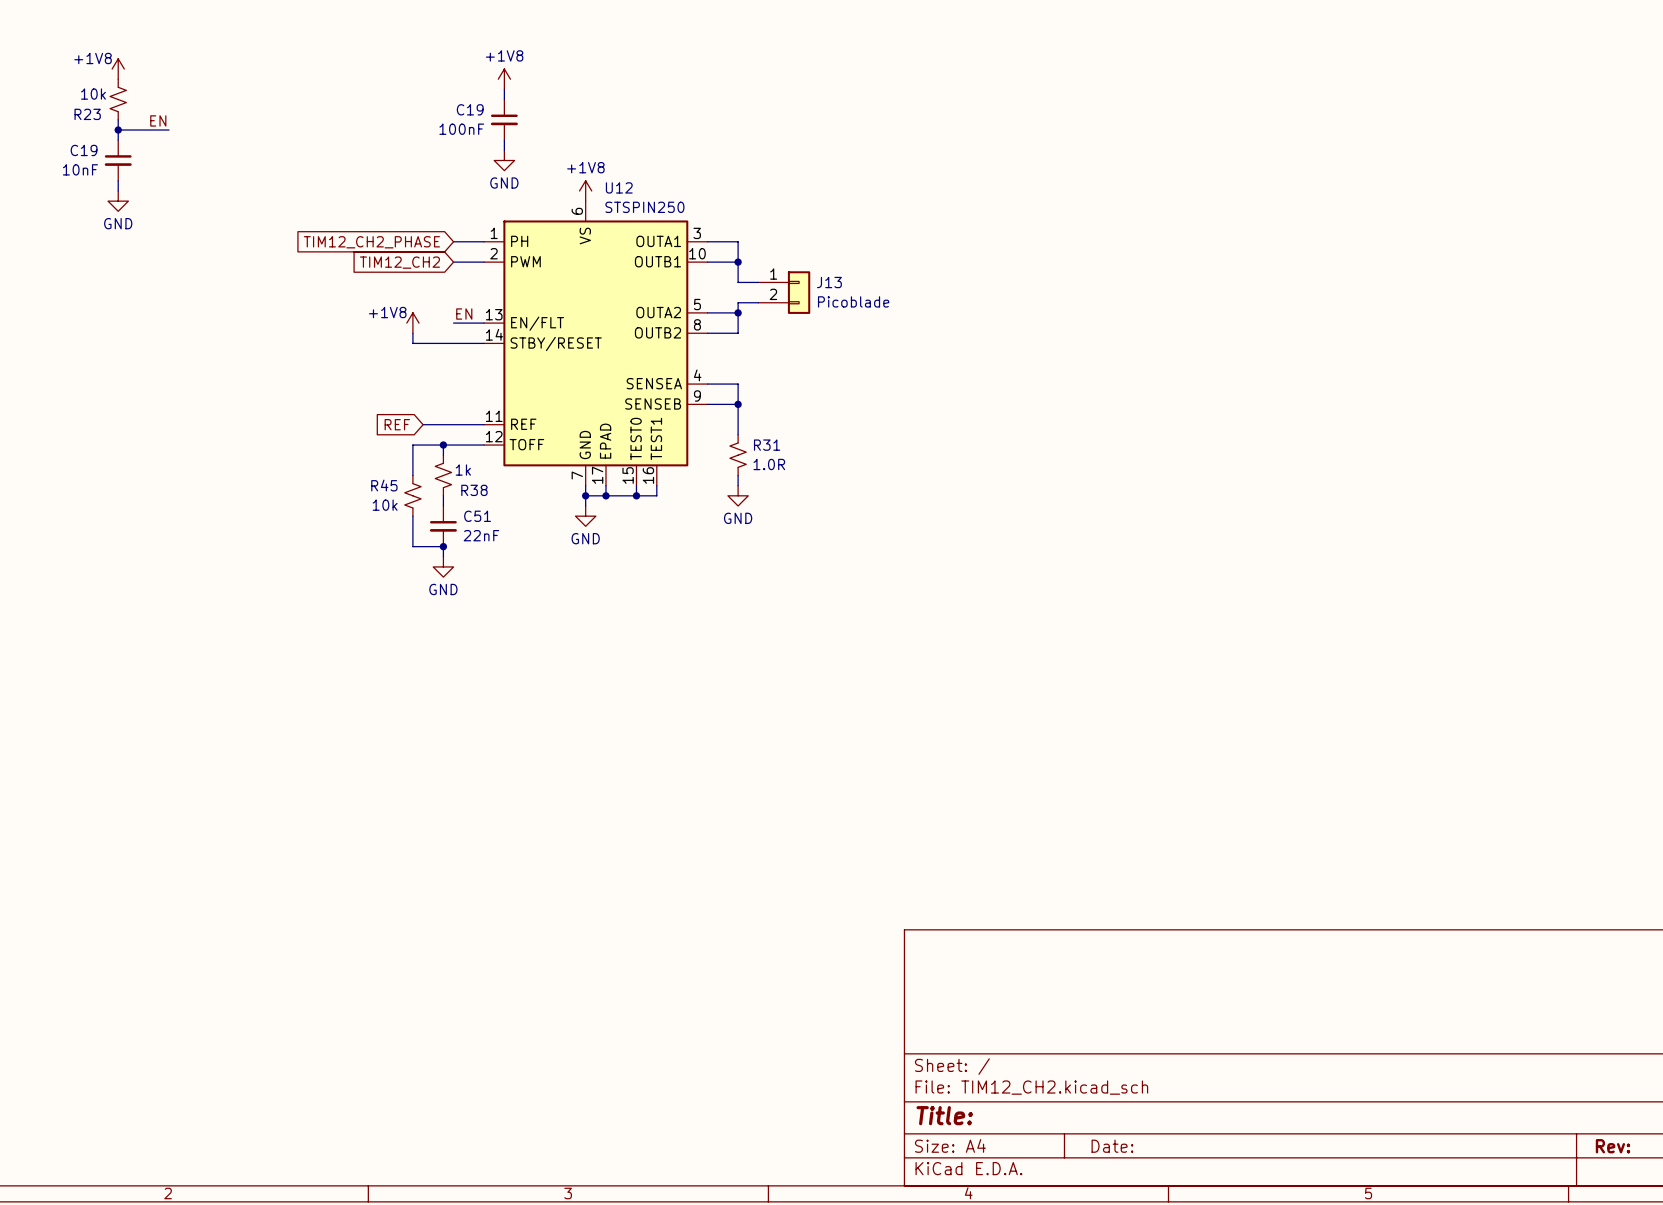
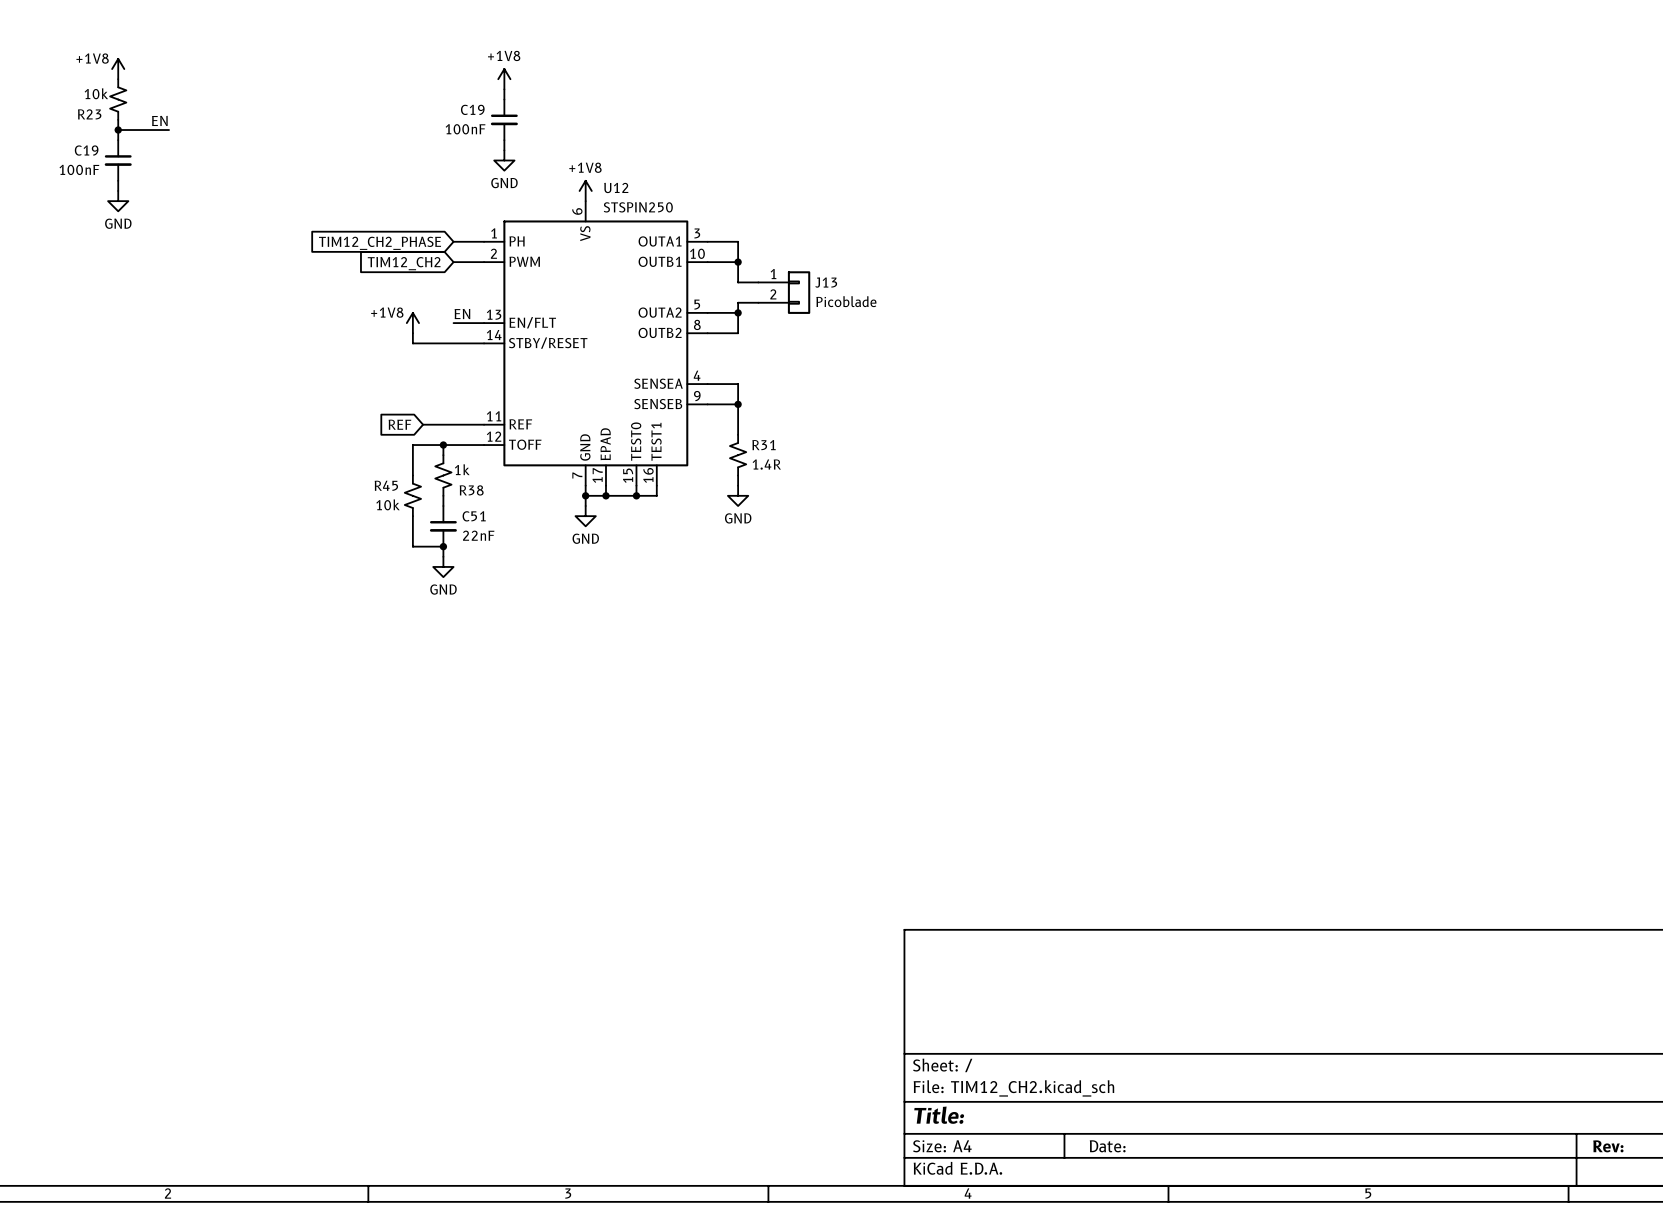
C19 value: 10nF (80, 169) -> 100nF (79, 169)
R31 value: 1.0R (769, 464) -> 1.4R (766, 464)

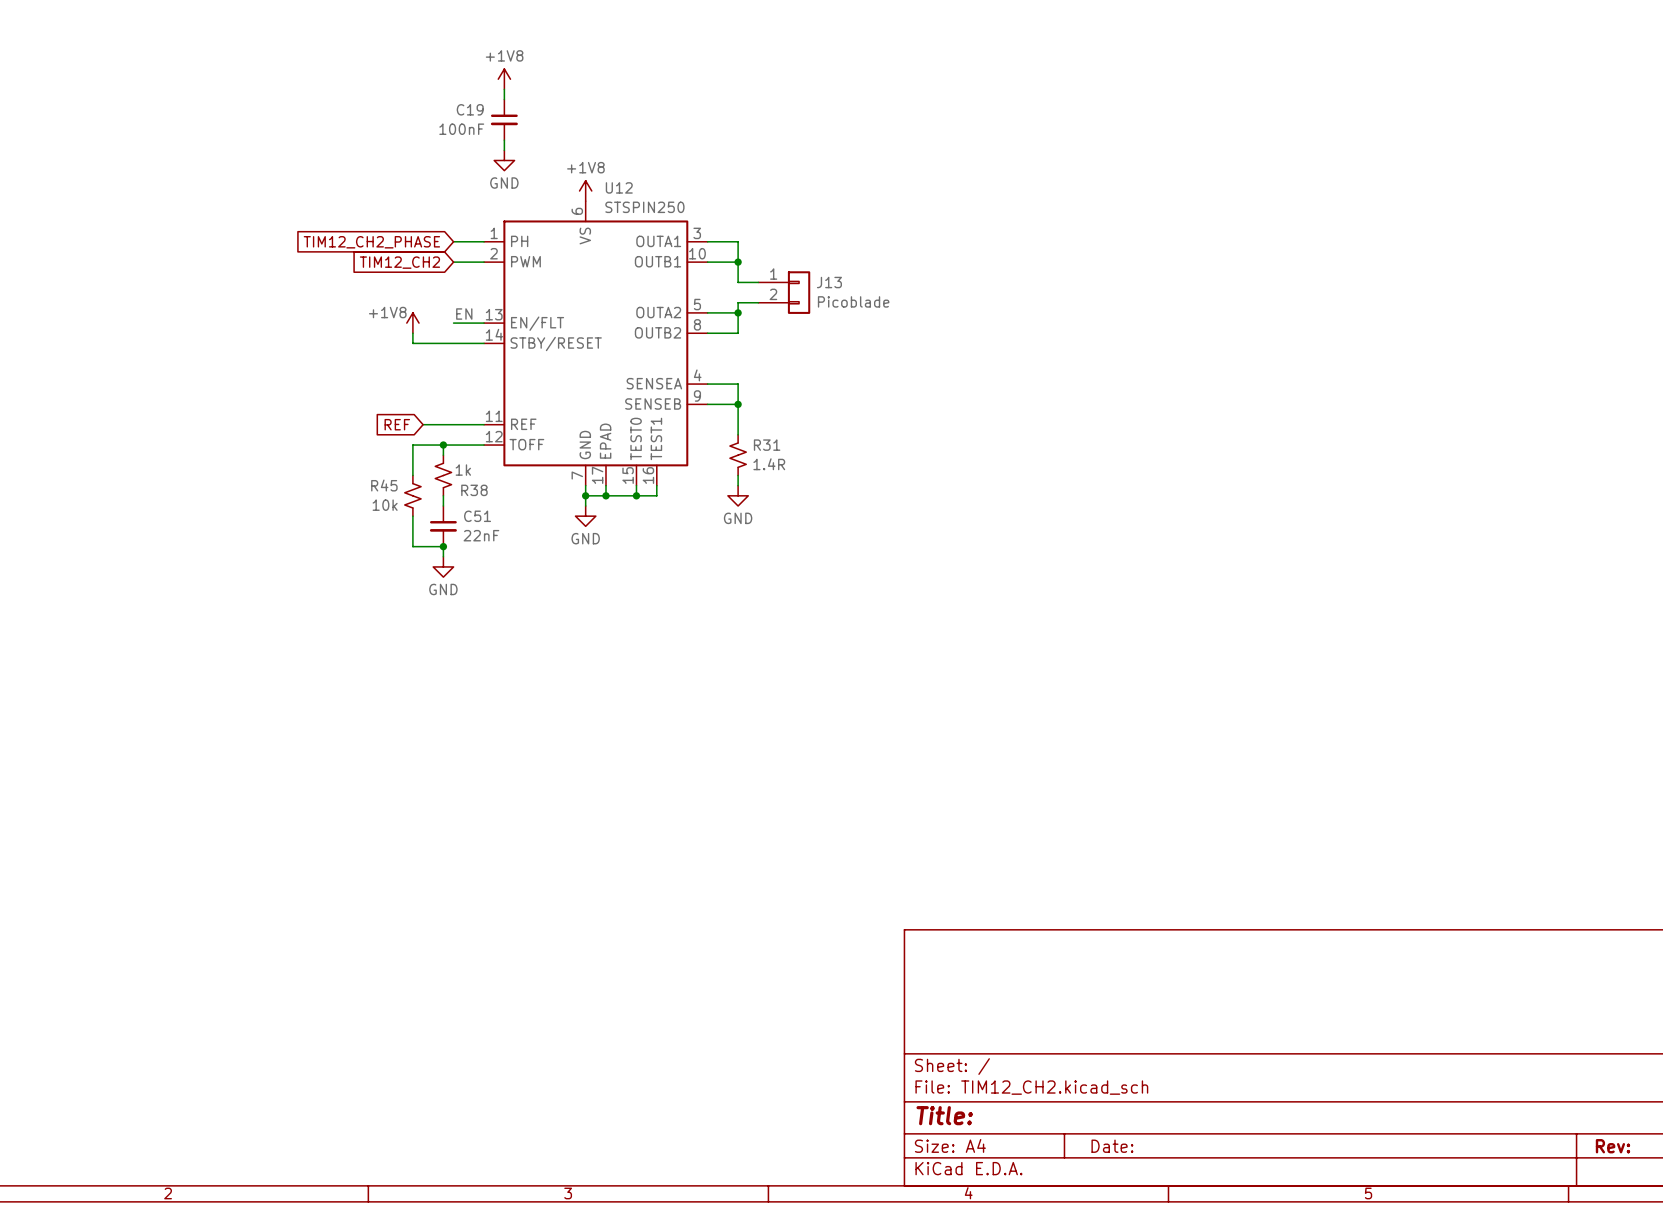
power symbol: +1V8 (118, 69) -> none
R23: 10k (118, 99) -> none
wire: (118, 119) (118, 140) -> none
label: EN (159, 120) -> none
wire: (118, 130) (169, 130) -> none
junction: (118, 130) -> none
C19: 100nF (118, 160) -> none
wire: (118, 180) (118, 190) -> none
power symbol: GND (118, 201) -> none

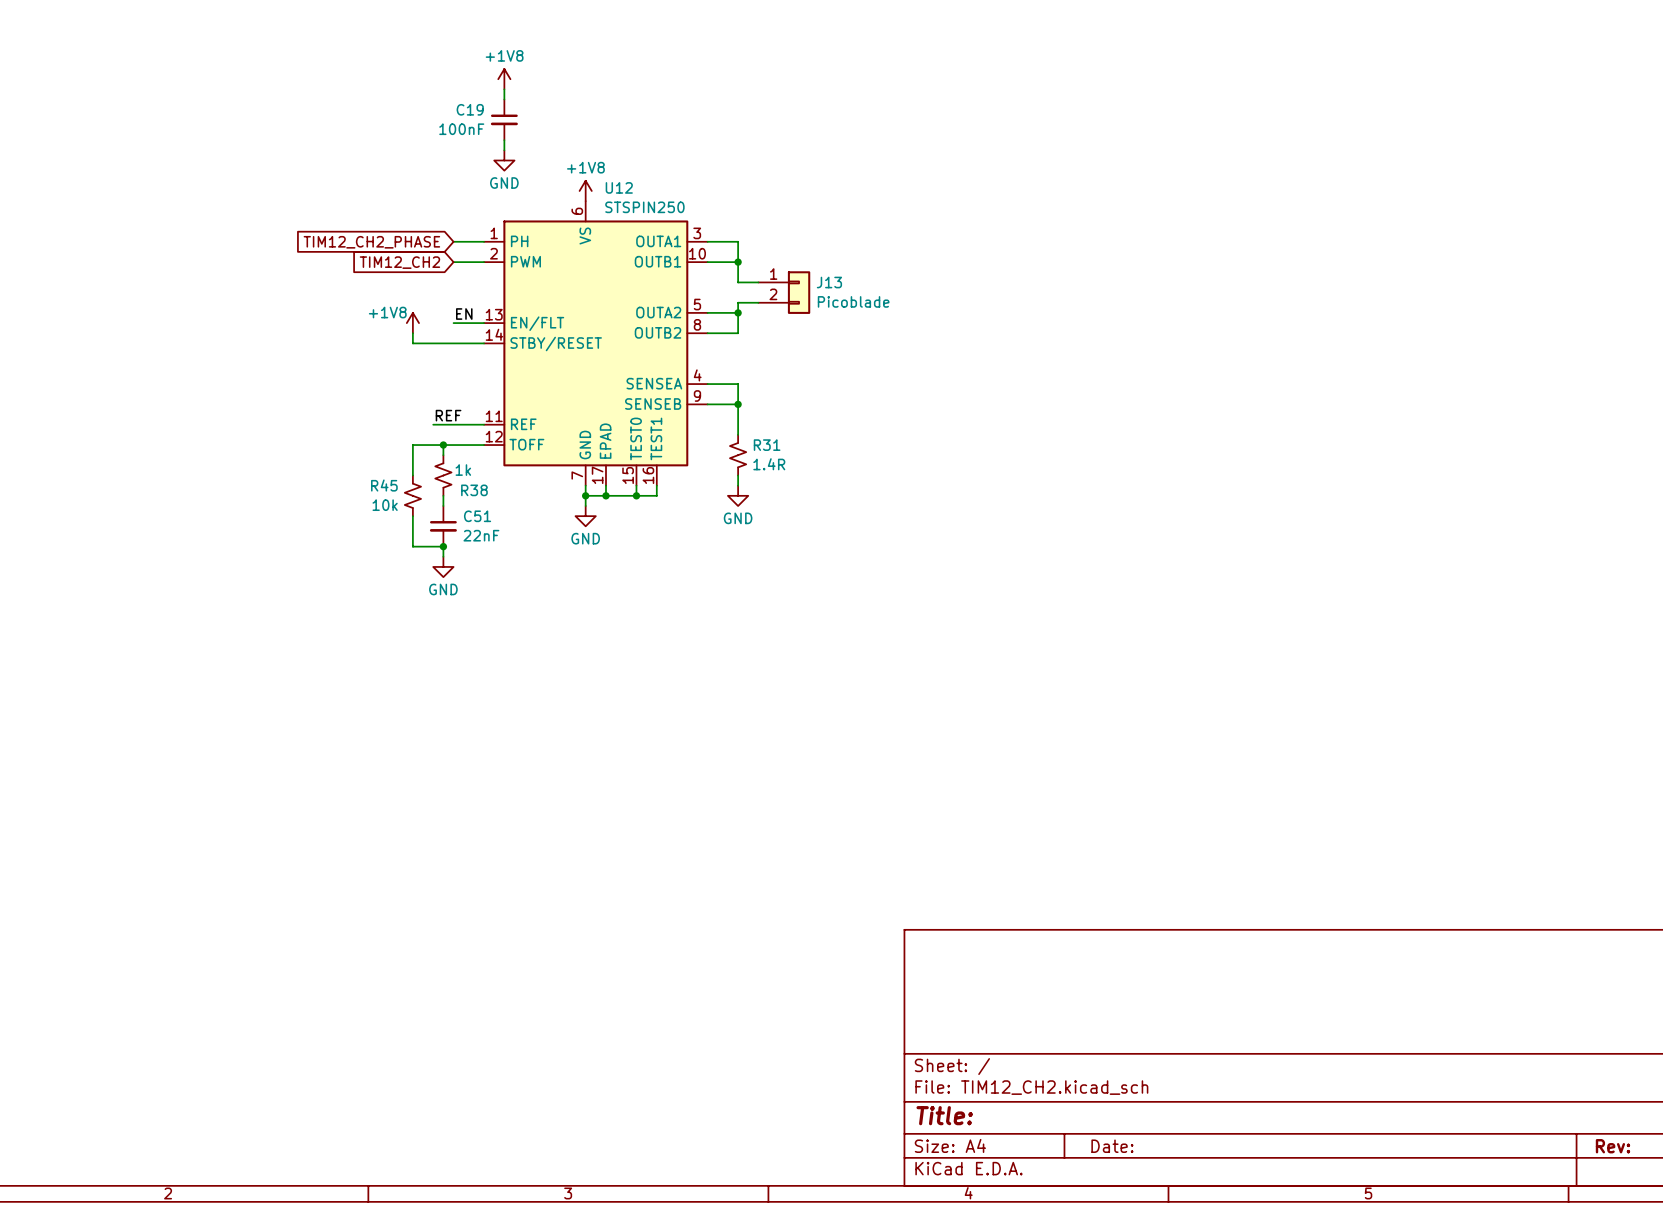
label: none -> REF (448, 415)
global label: REF (397, 424) -> none
wire: (423, 424) (433, 424) -> none

